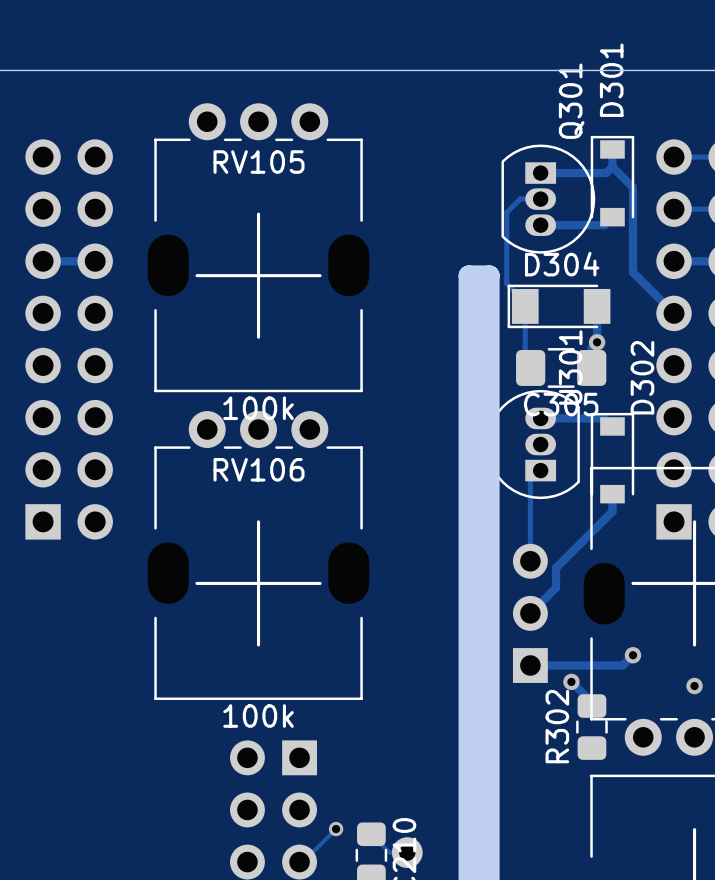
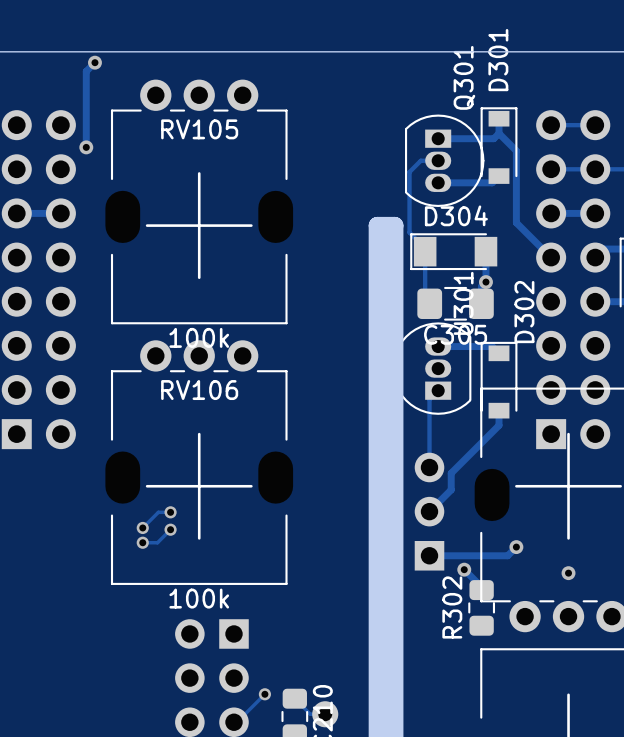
track: none -> (94, 62) (86, 71) (86, 147)
via: none -> (94, 62)
via: none -> (86, 147)
track: none -> (170, 512) (158, 512) (142, 527)
via: none -> (170, 512)
via: none -> (142, 527)
track: none -> (170, 529) (157, 542) (142, 542)
via: none -> (170, 529)
via: none -> (142, 542)

